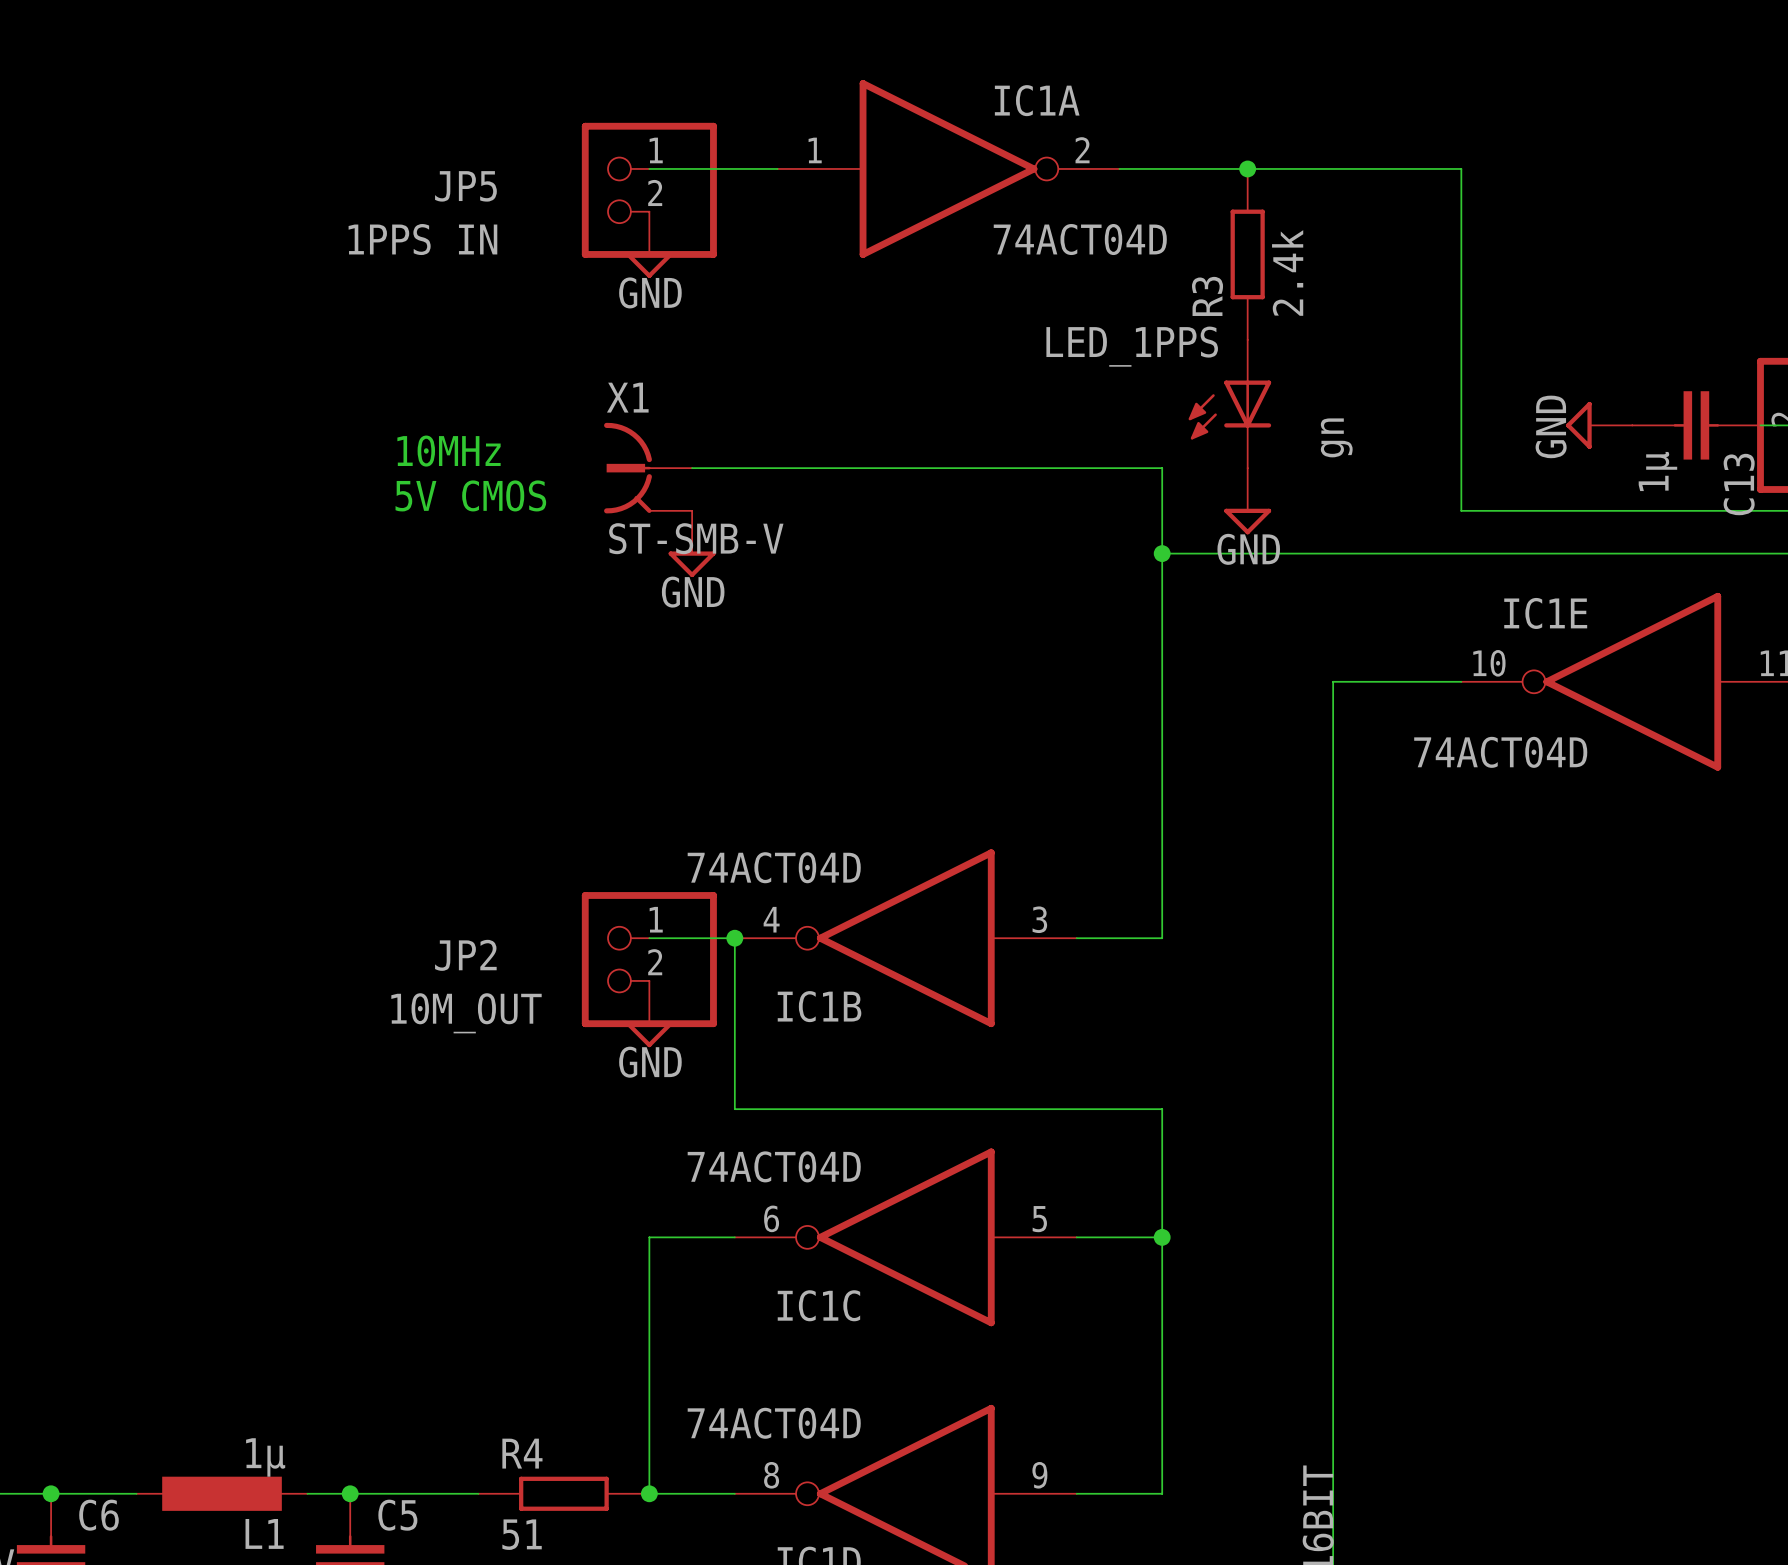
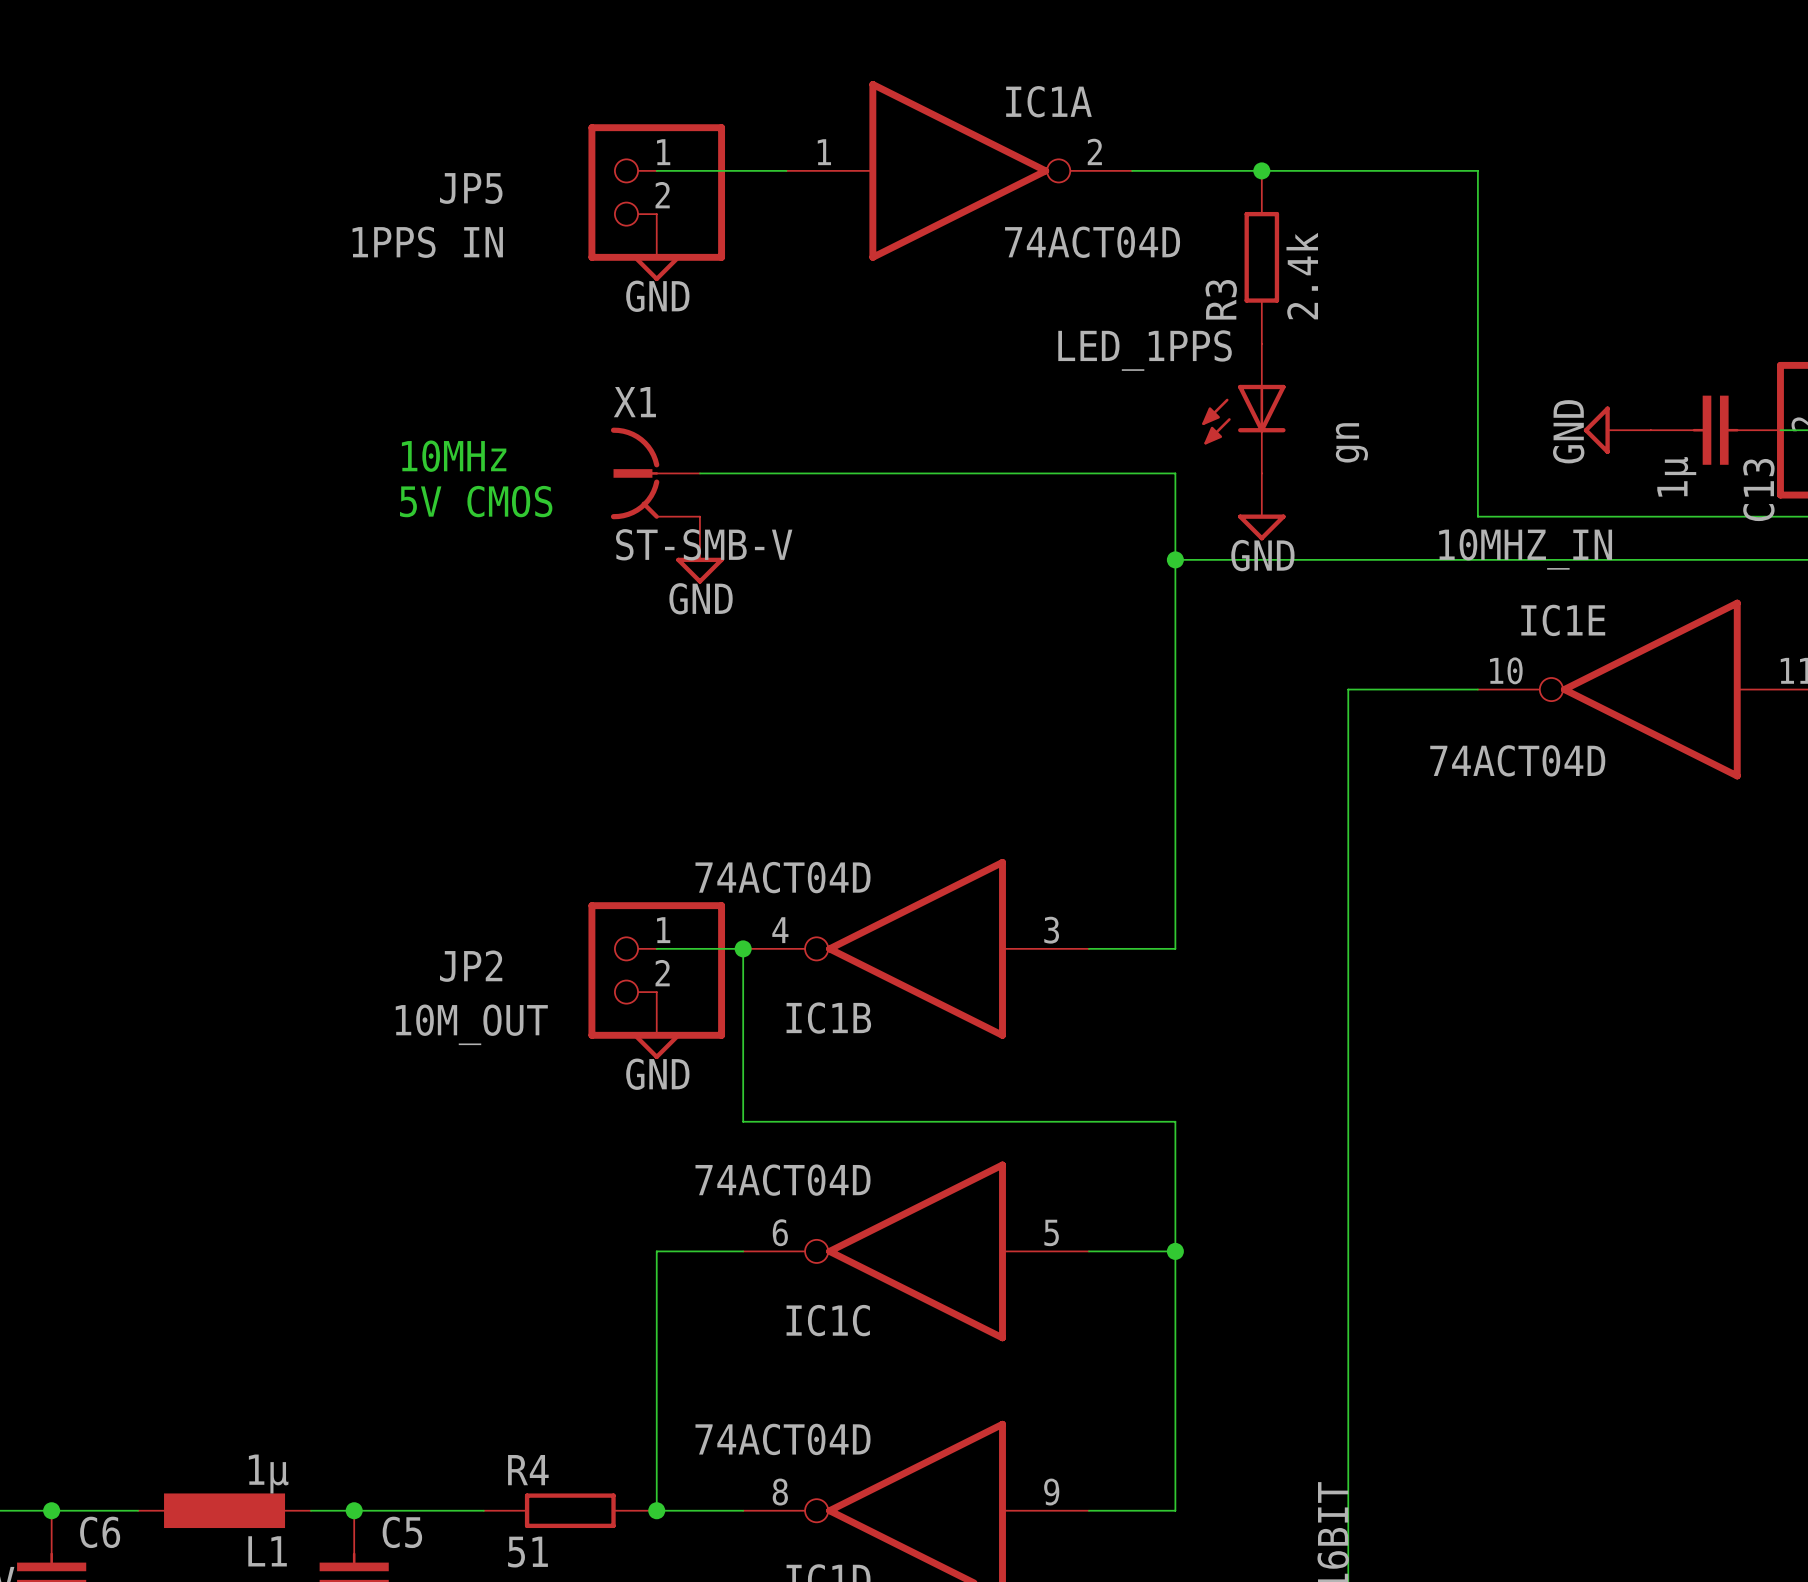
label: none -> 10MHZ_IN (1525, 549)

